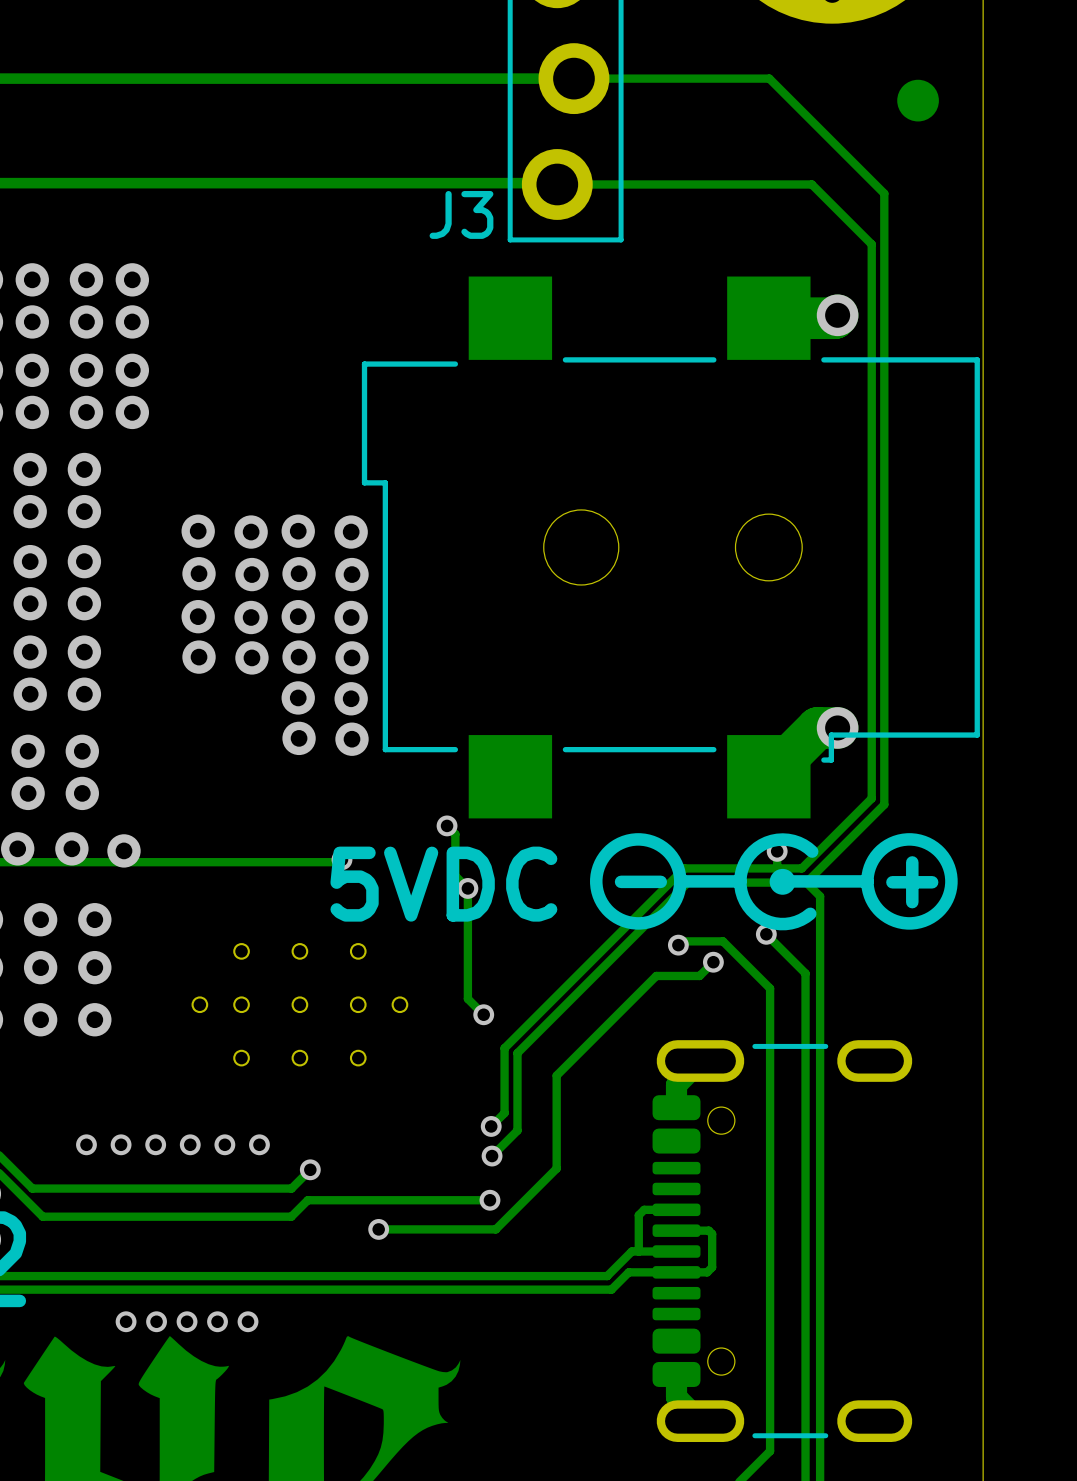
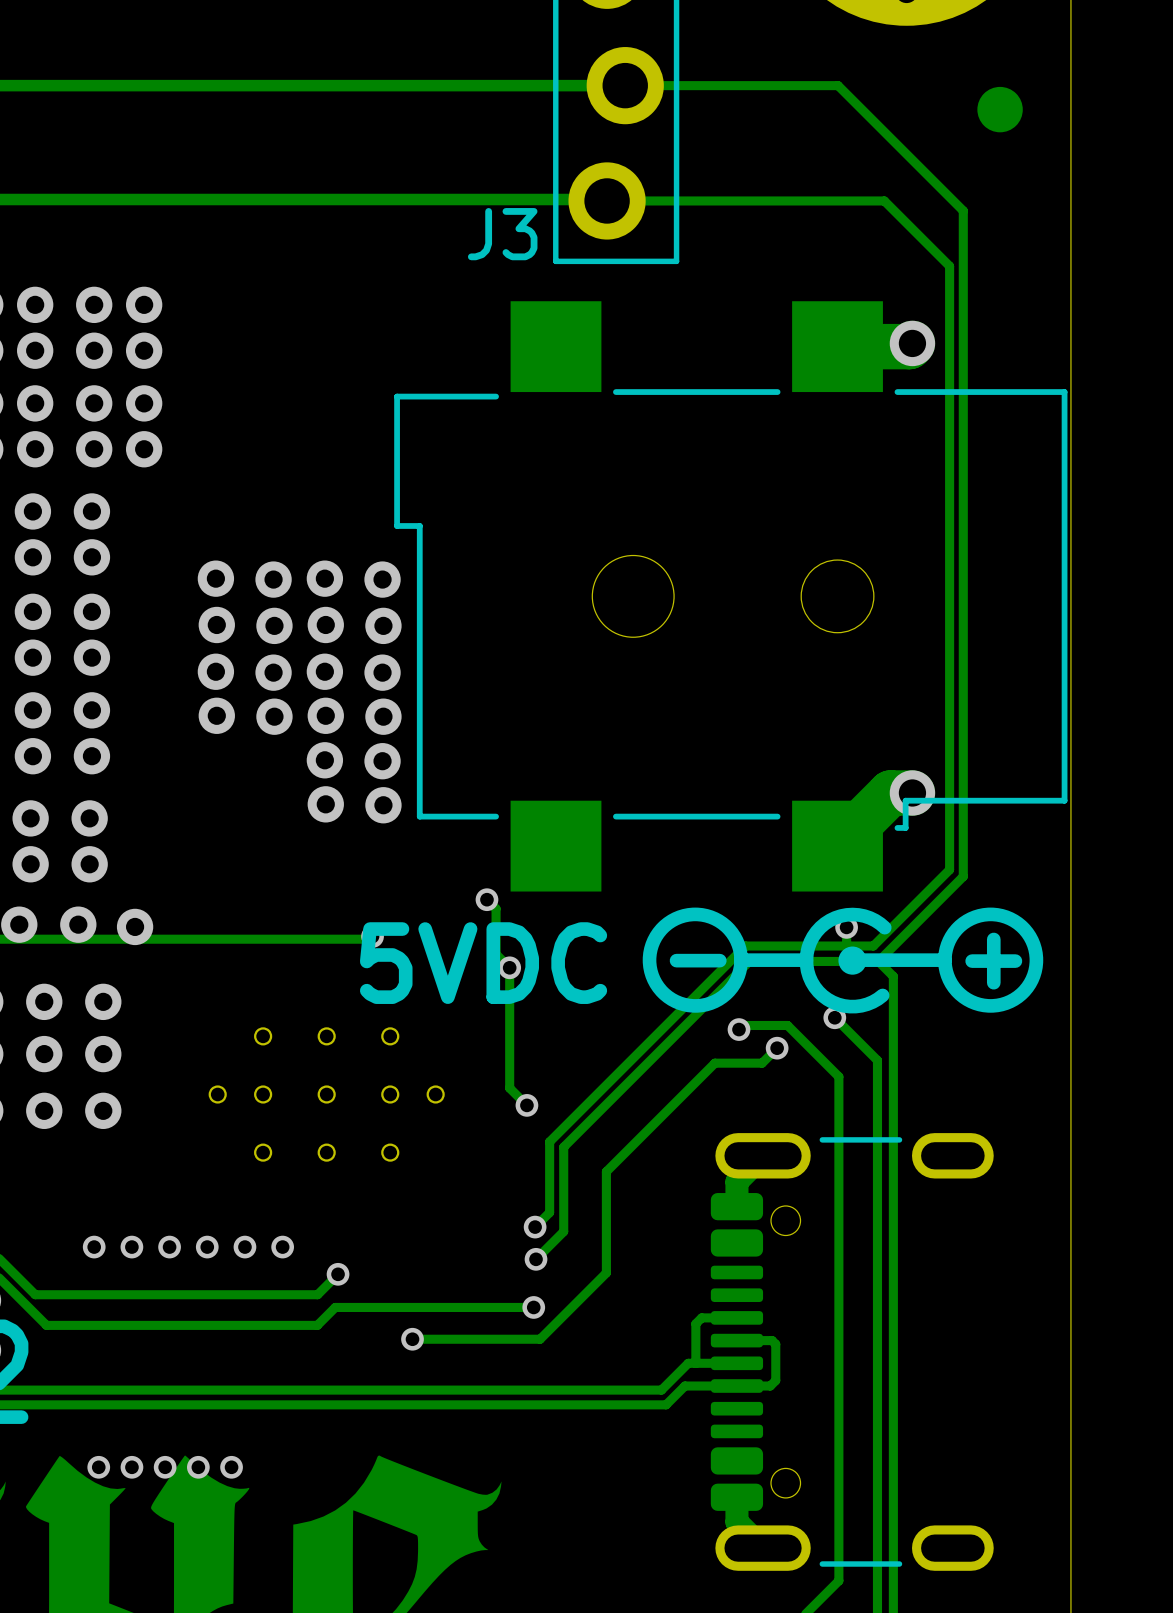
via: (126, 1321) -> none
via: (156, 1321) -> none
via: (187, 1321) -> none
via: (217, 1321) -> none
via: (248, 1321) -> none
via: none -> (98, 1467)
via: none -> (131, 1467)
via: none -> (165, 1467)
via: none -> (198, 1467)
via: none -> (231, 1467)

